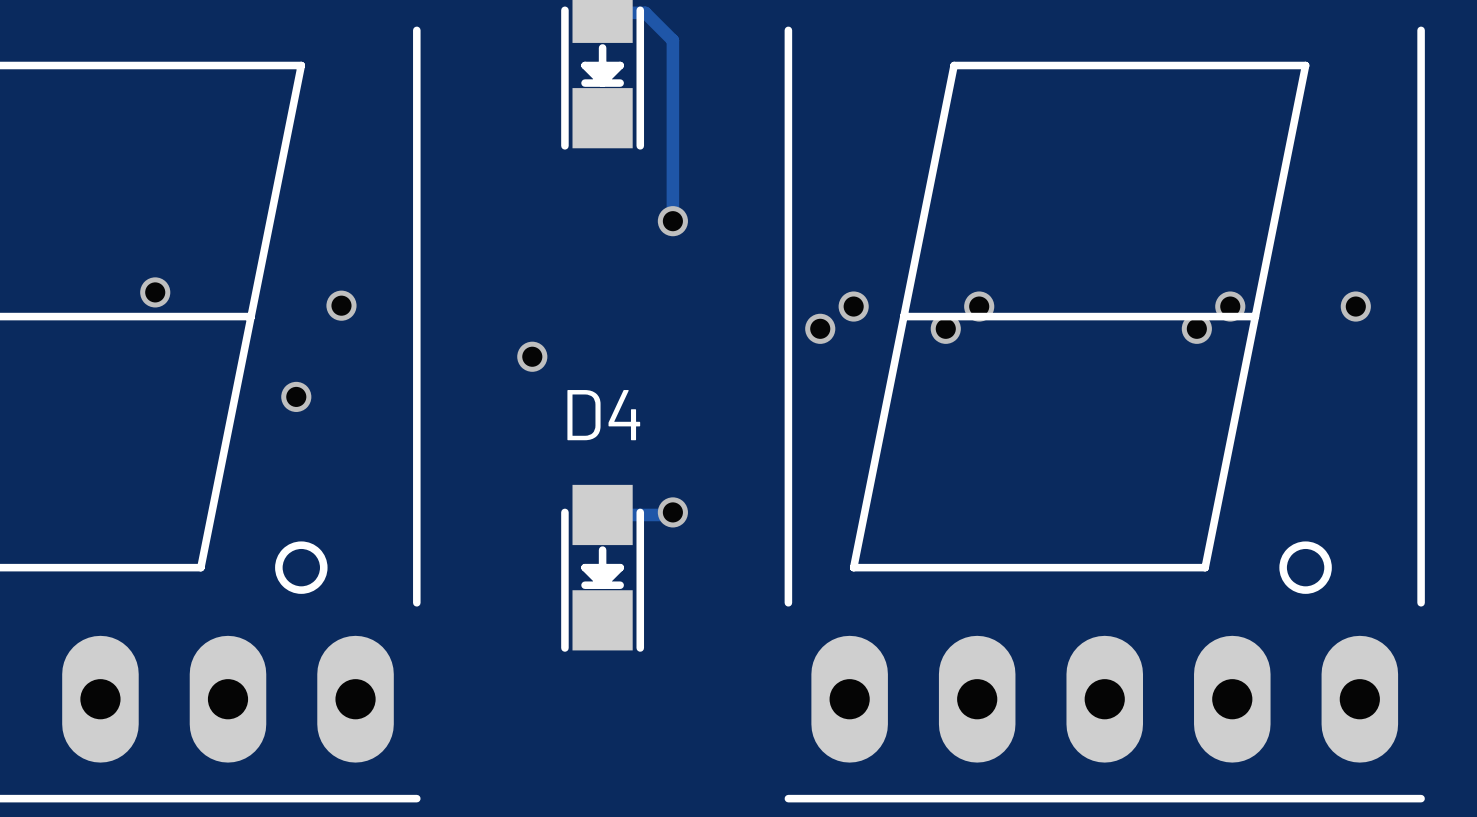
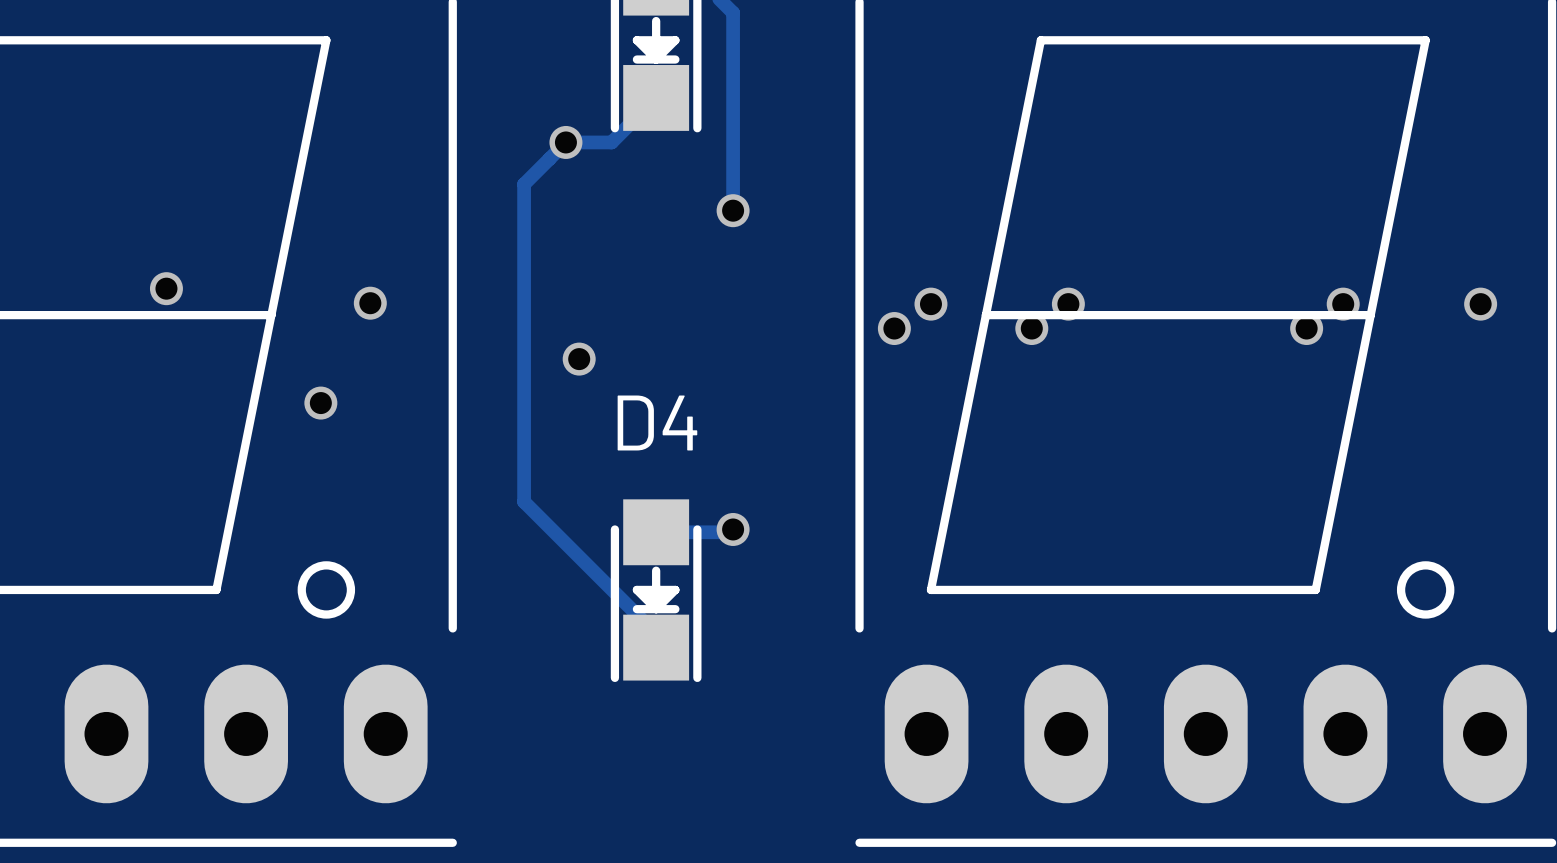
track: none -> (656, 97) (611, 142) (565, 142) (524, 184) (524, 501) (656, 633) (656, 647)
via: none -> (565, 142)

